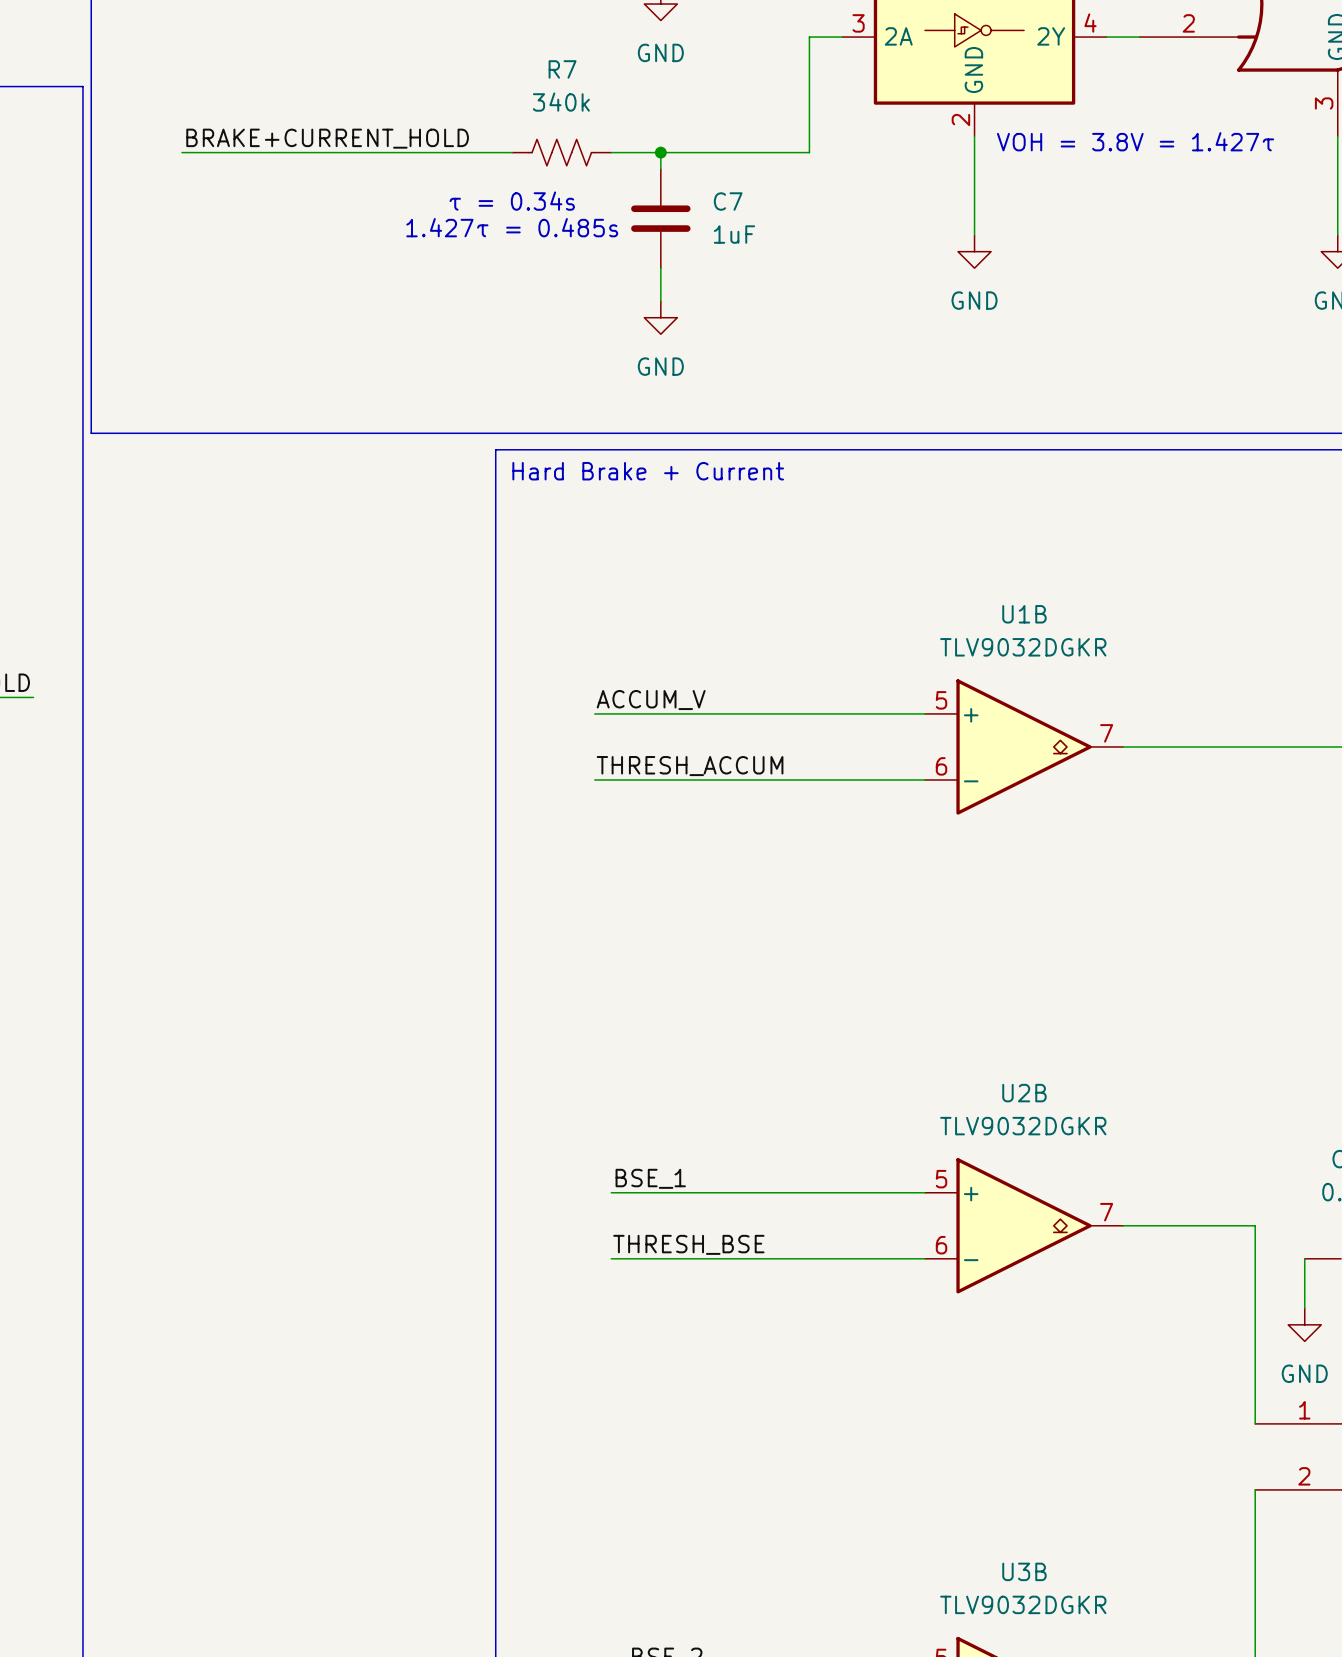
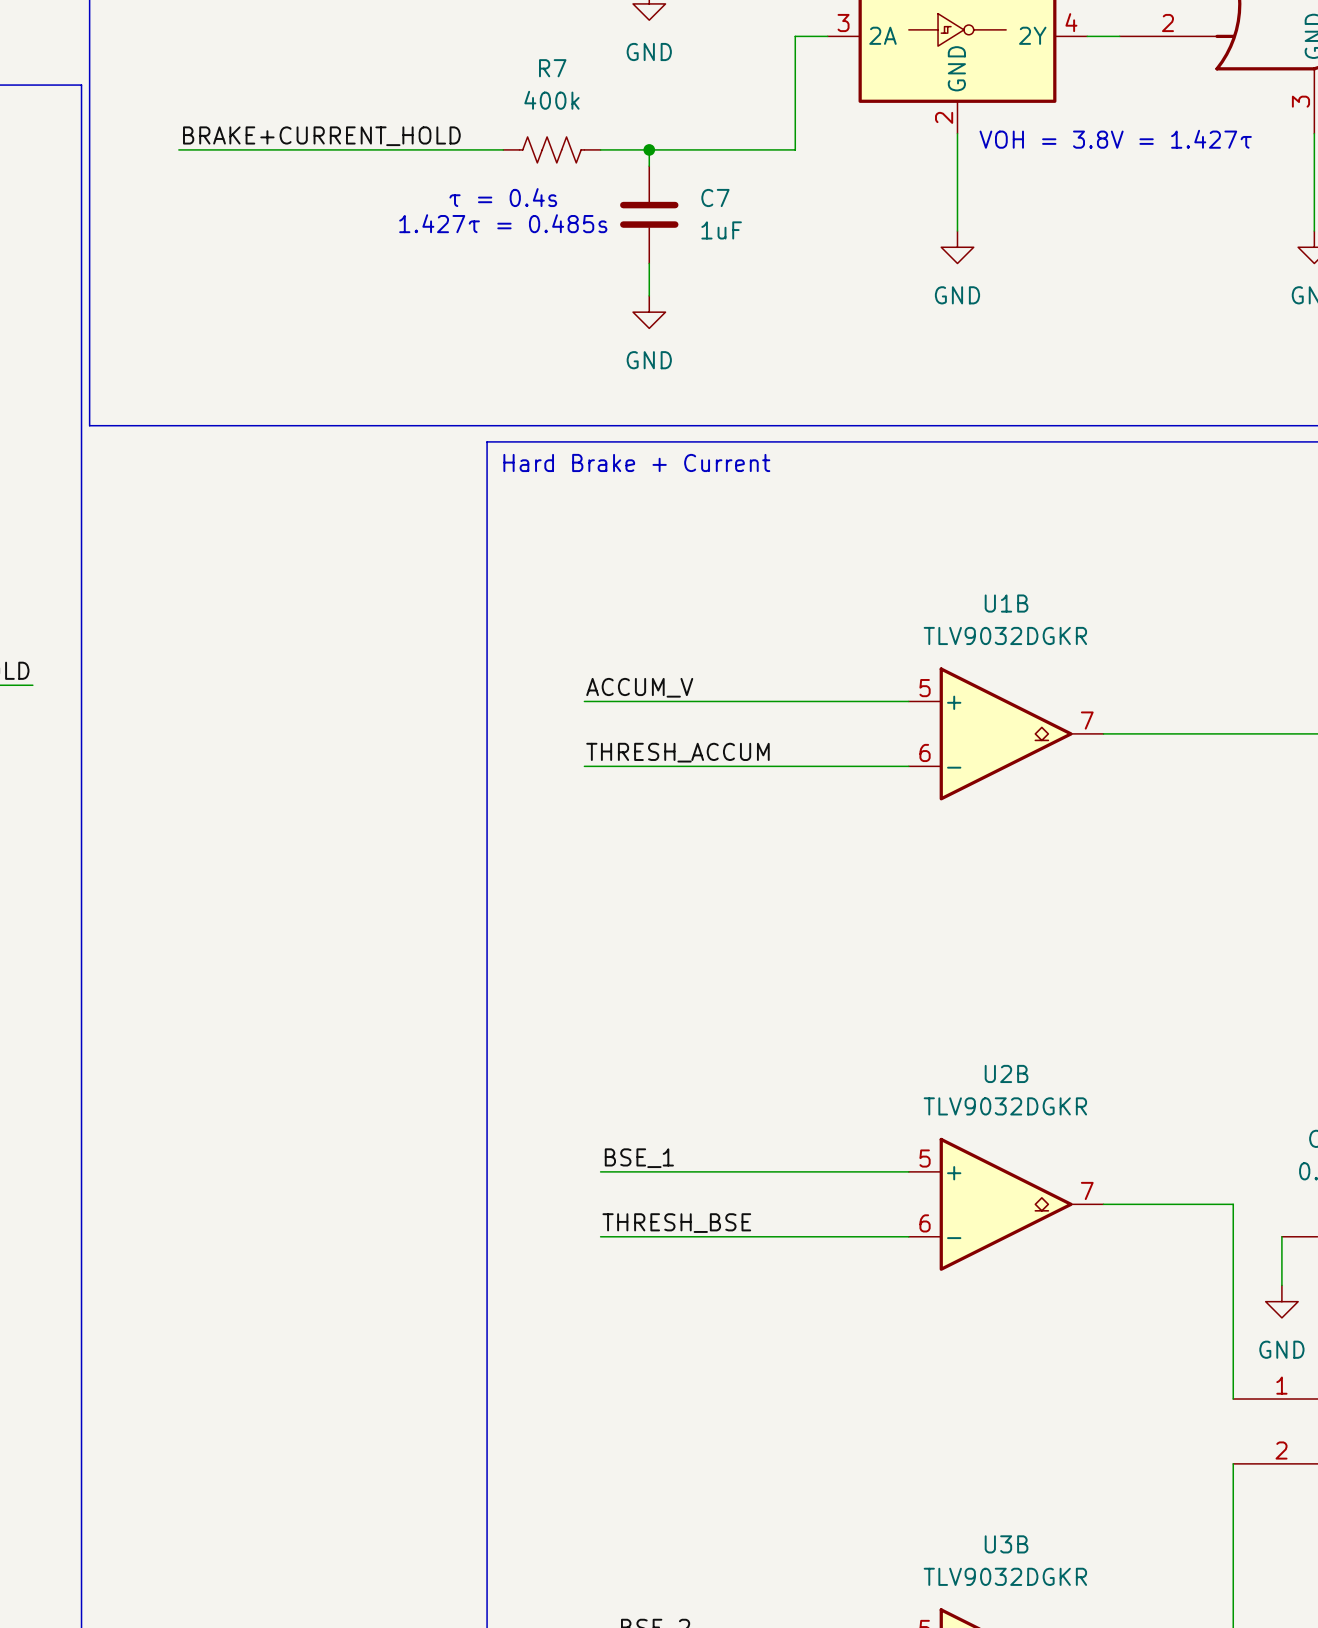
R7 value: 340k (561, 102) -> 400k (551, 100)
text: τ = 0.34s (512, 201) -> τ = 0.4s (503, 197)

